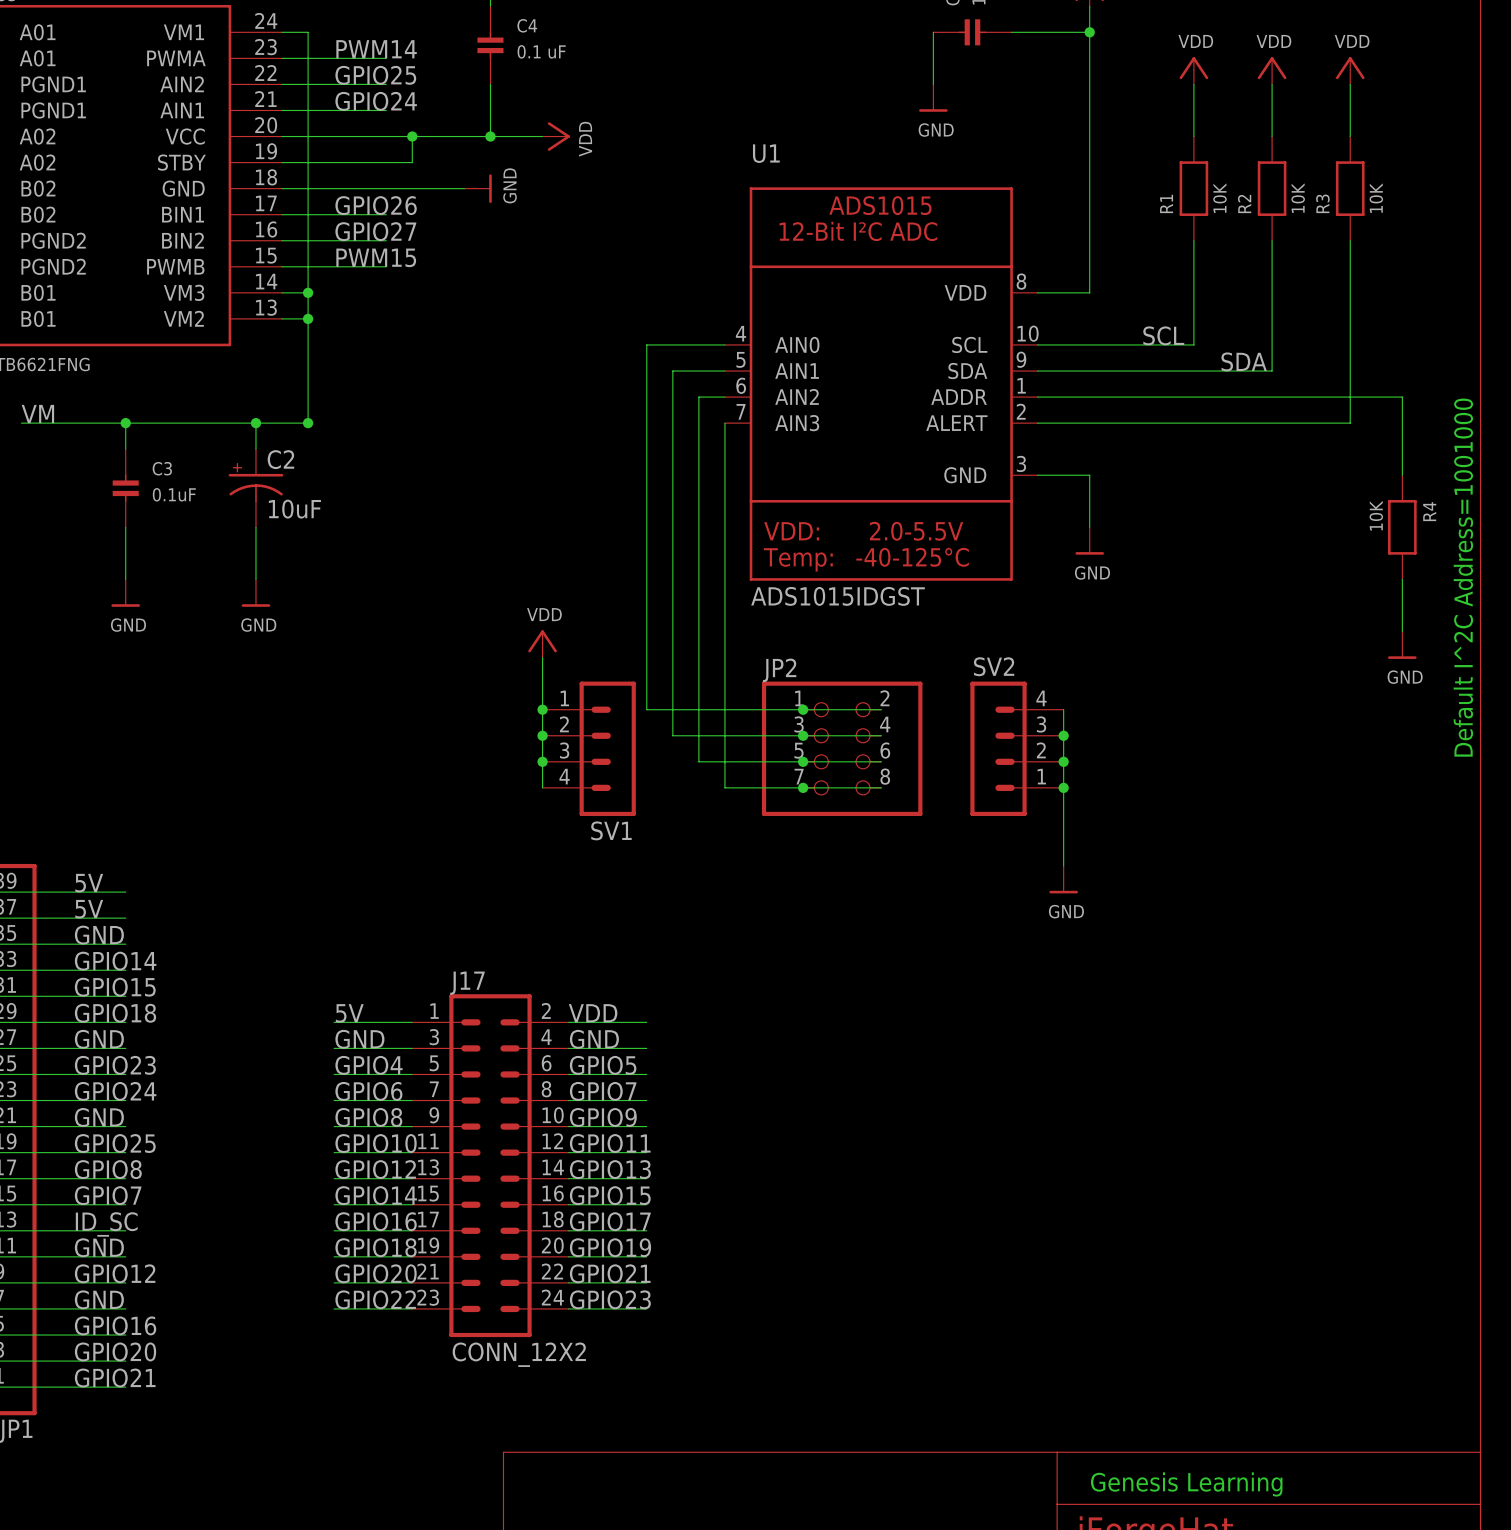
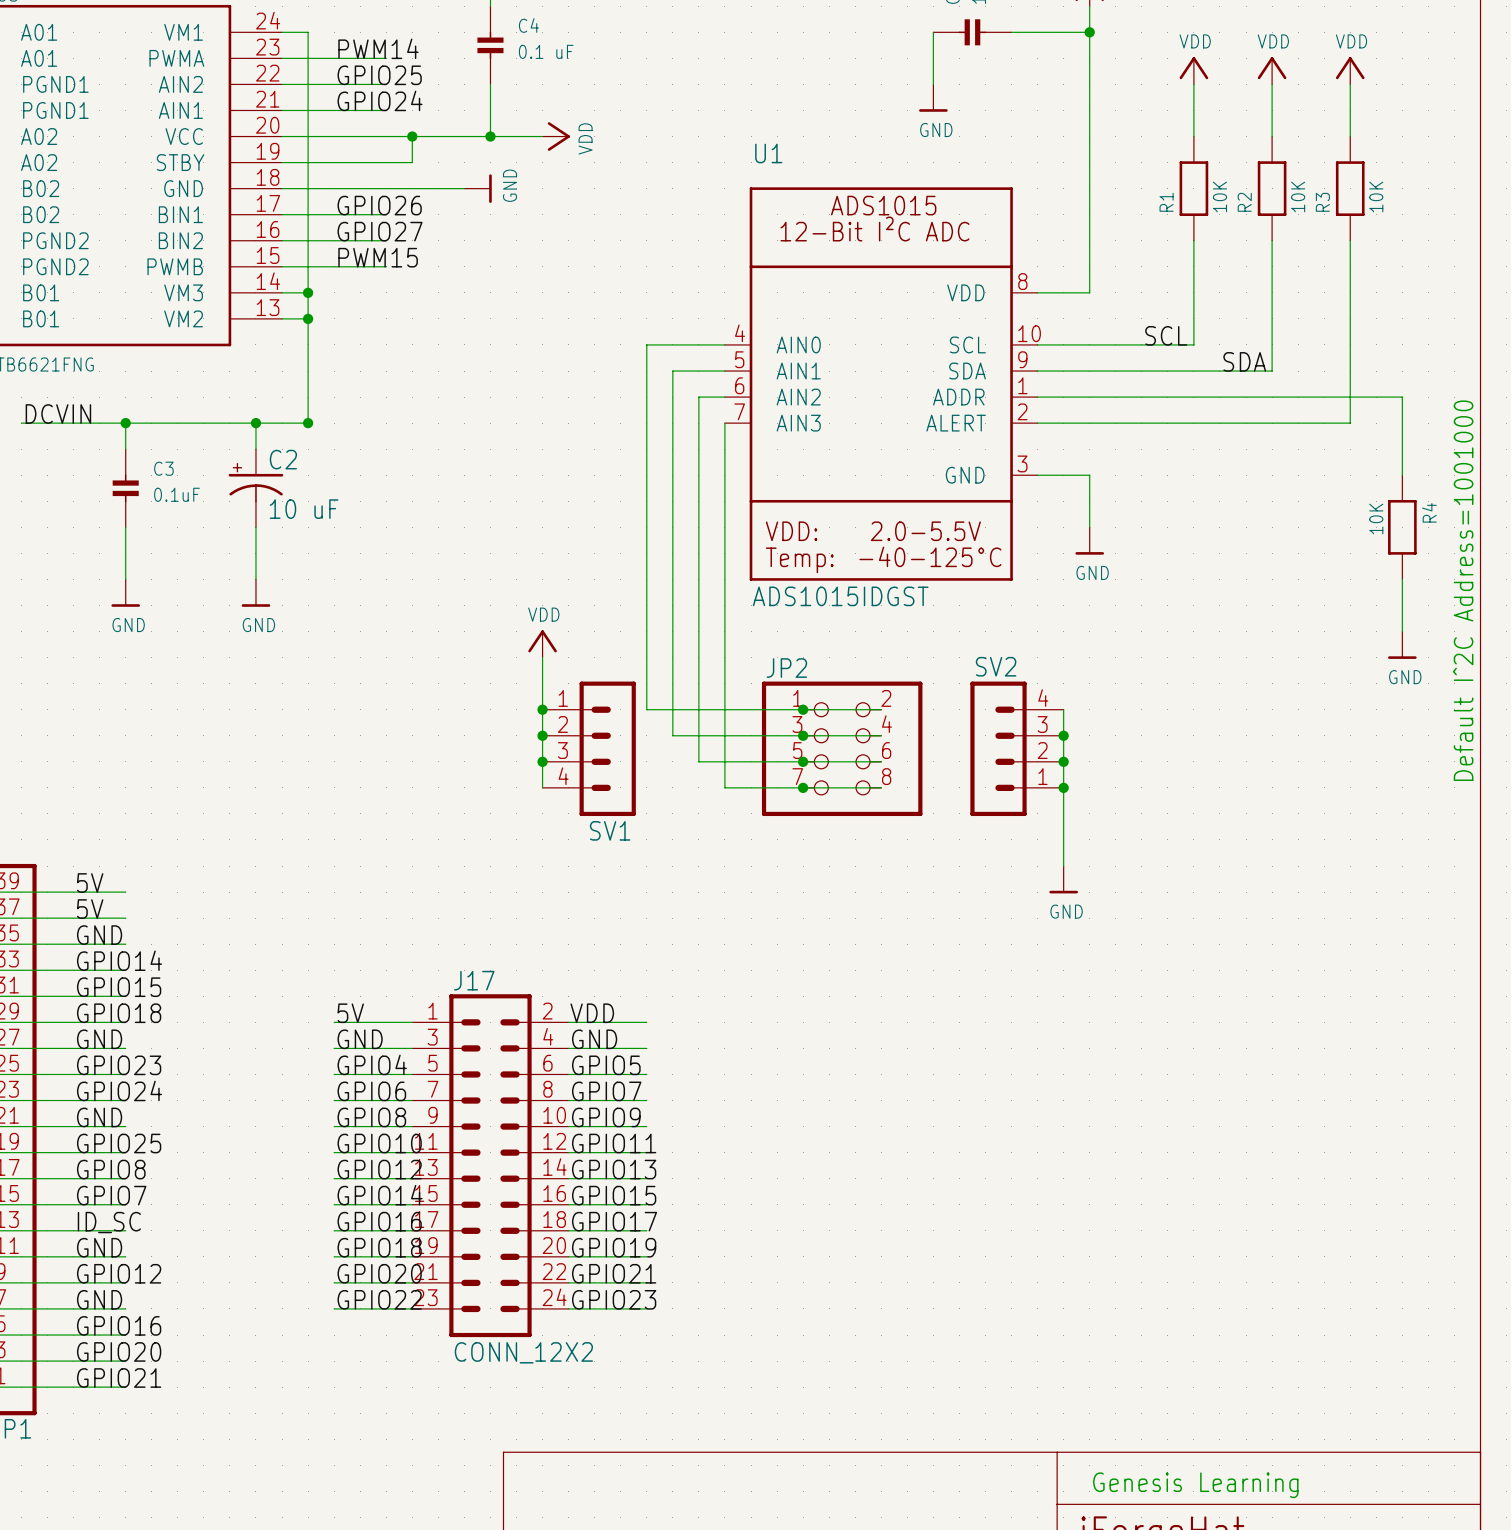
label: VM (37, 414) -> DCVIN (58, 414)
C2 value: 10uF (294, 509) -> 10 uF (304, 509)

